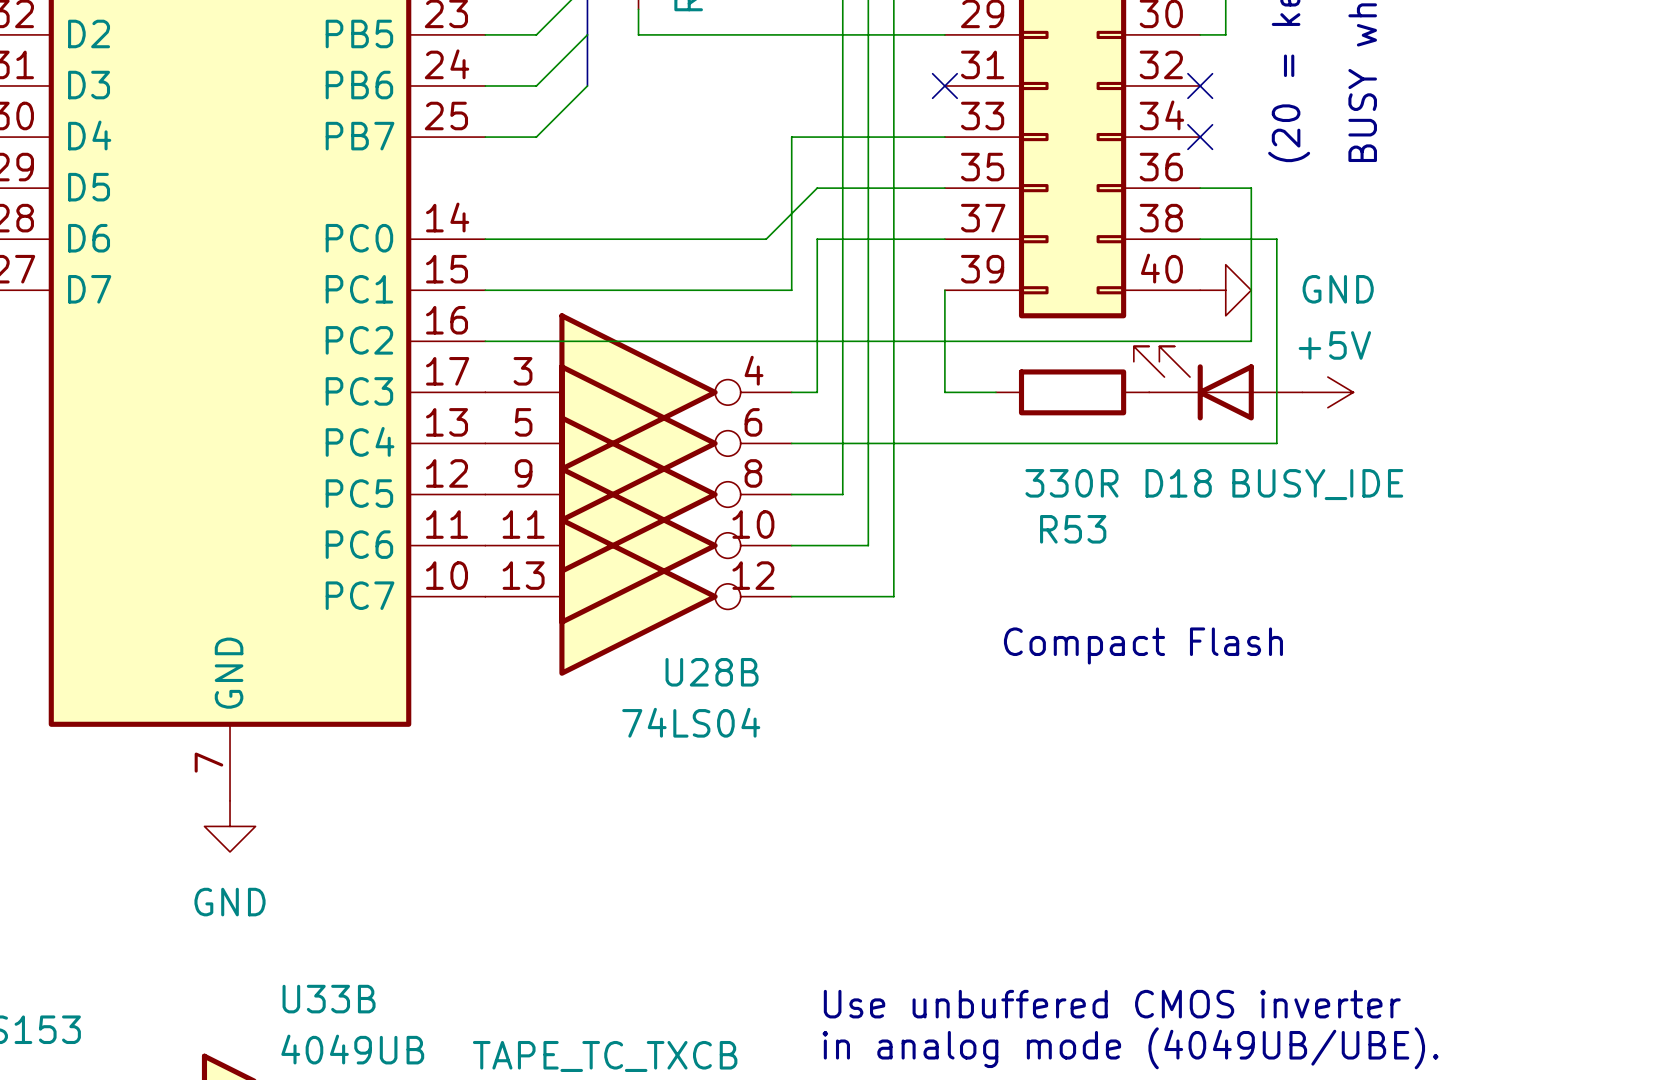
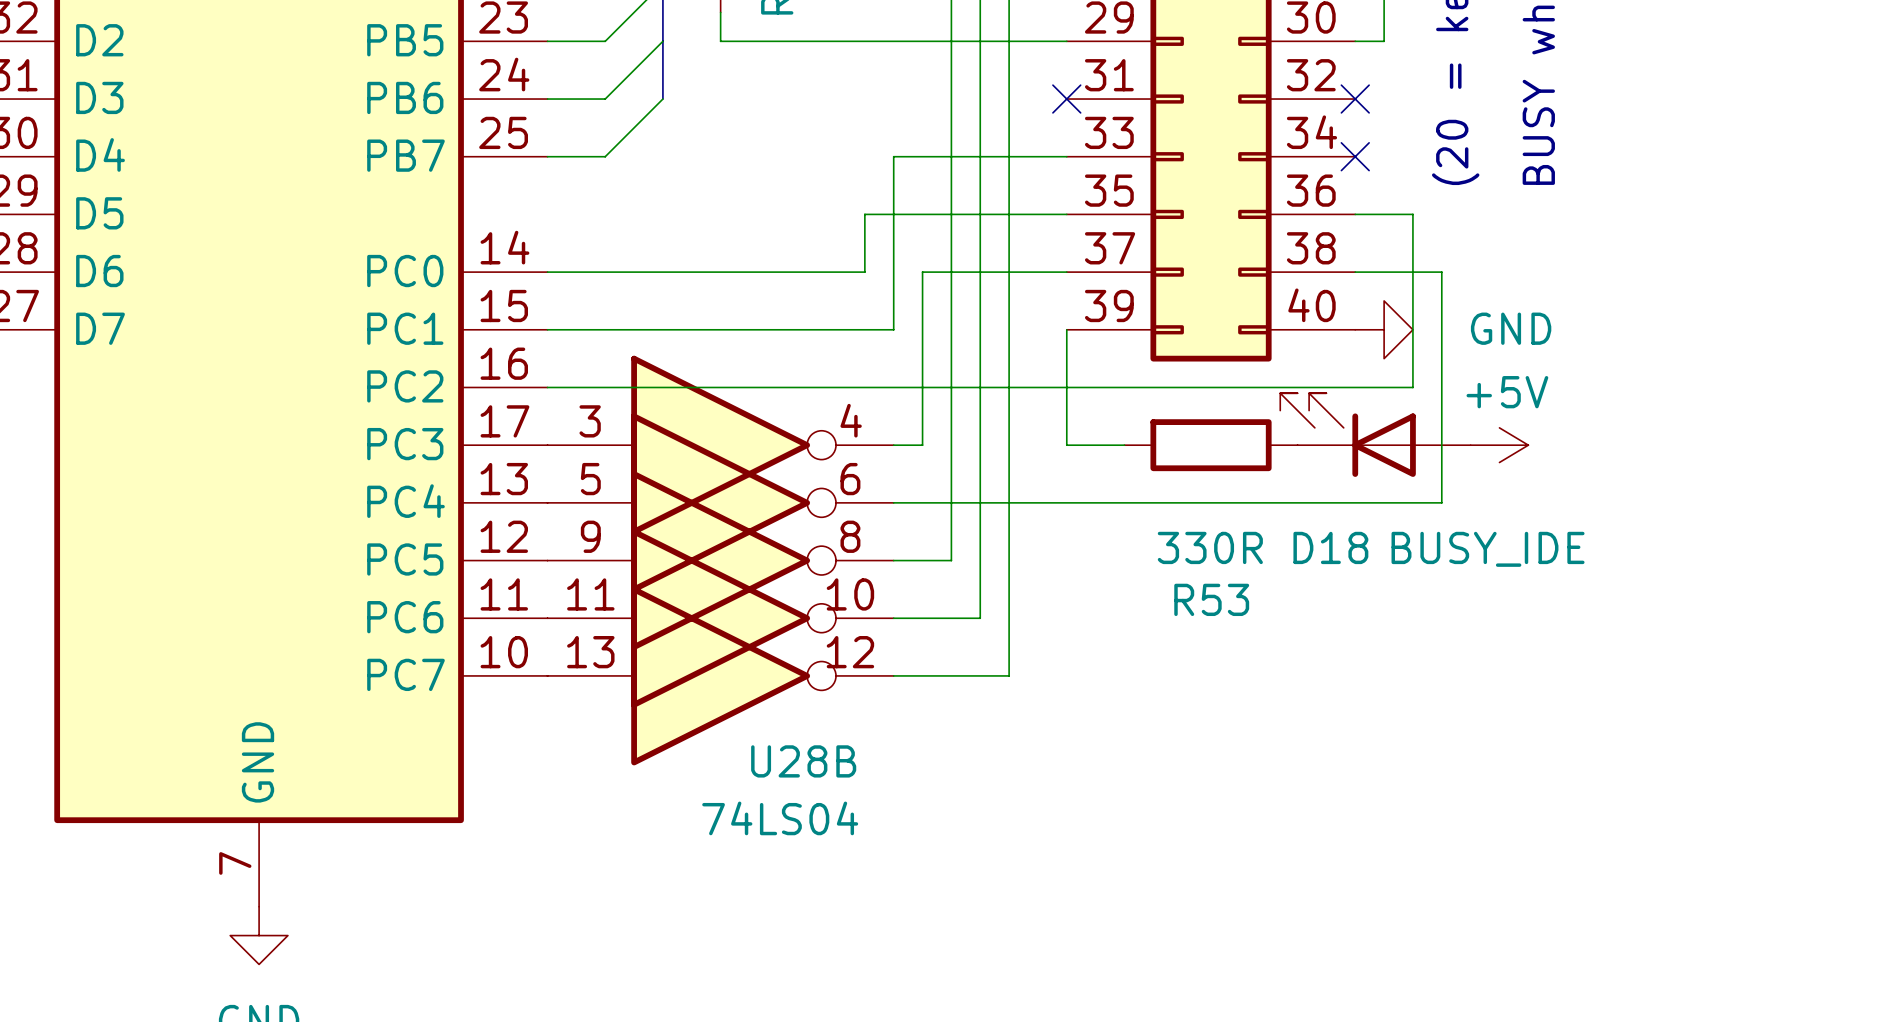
wire: (817, 188) (766, 239) -> (922, 214) (864, 214) (864, 272)
text: Compact Flash (1143, 645) -> none

